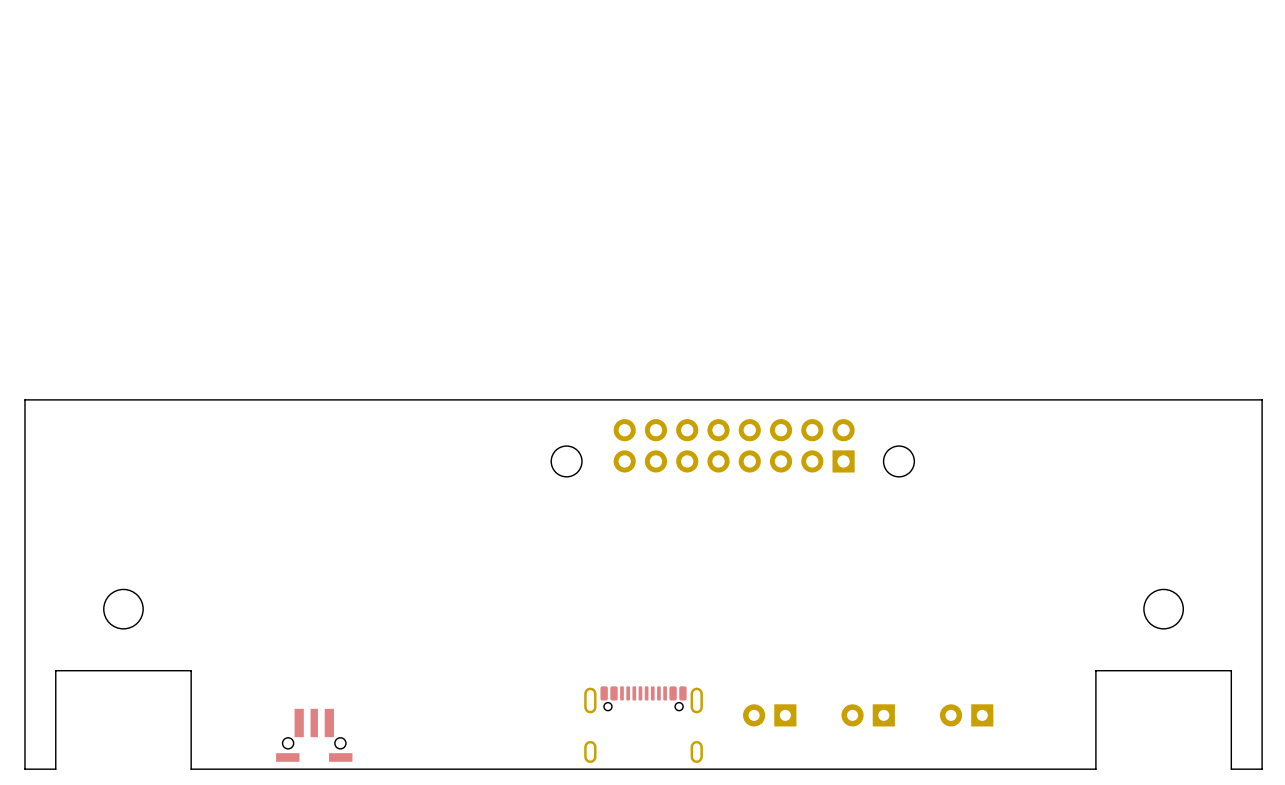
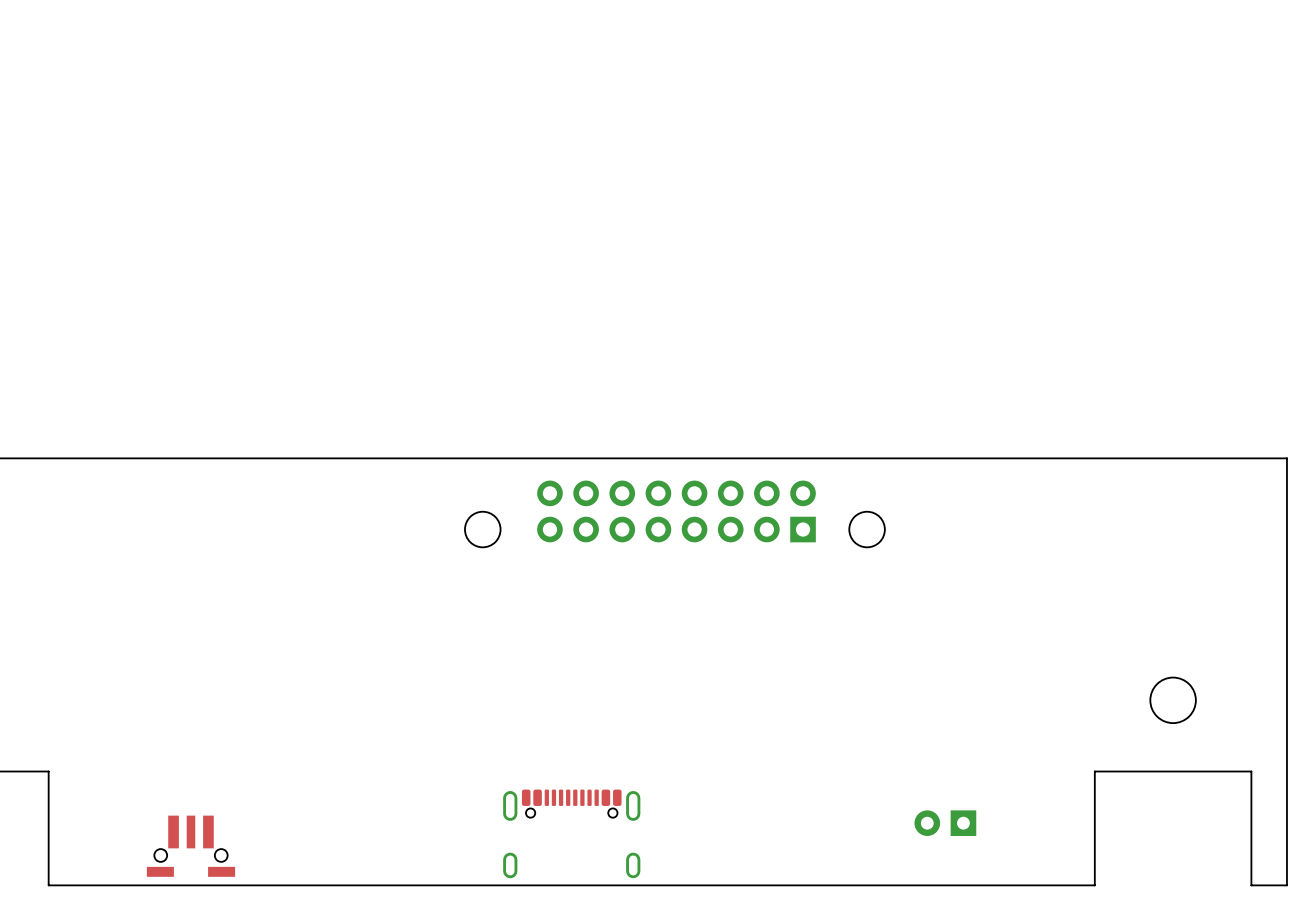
part: (769, 715) -> none
part: (868, 715) -> none

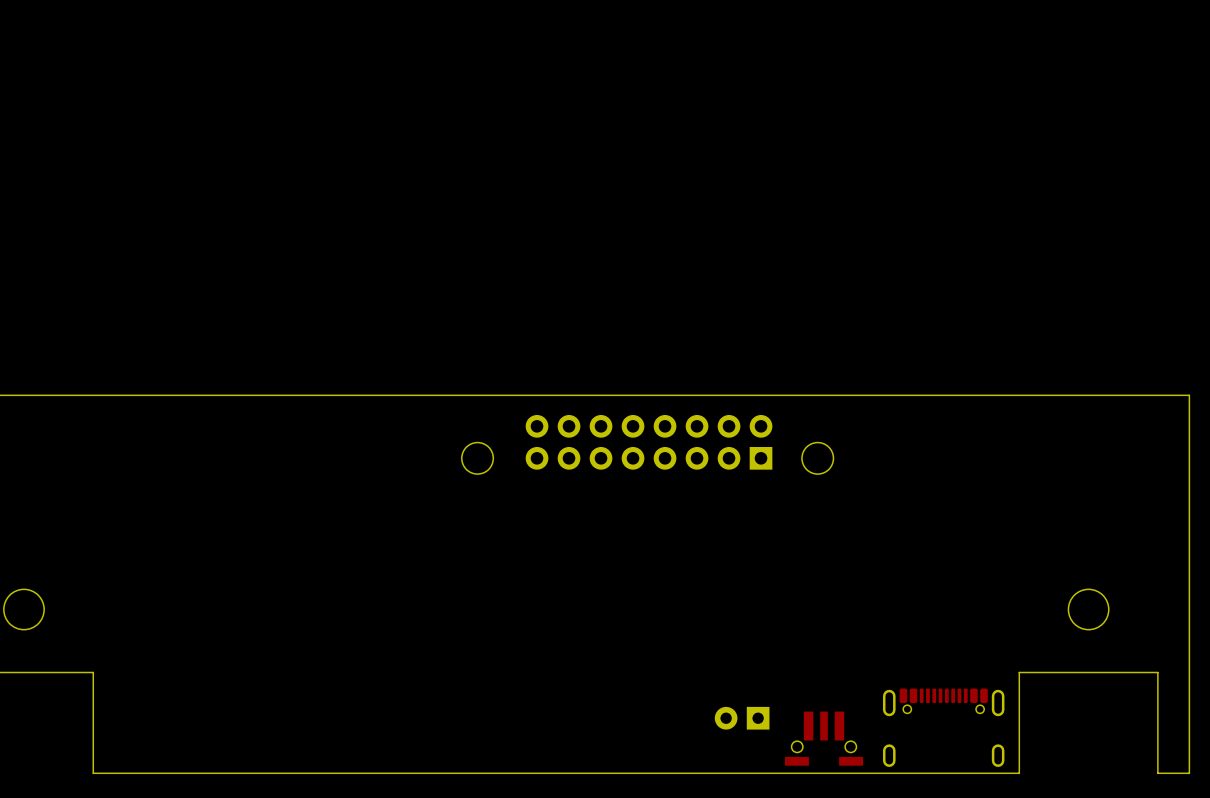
part position: (945, 823) -> (742, 718)
part: (571, 833) -> none
part: none -> (943, 727)
part: (190, 846) -> none
part: none -> (824, 738)

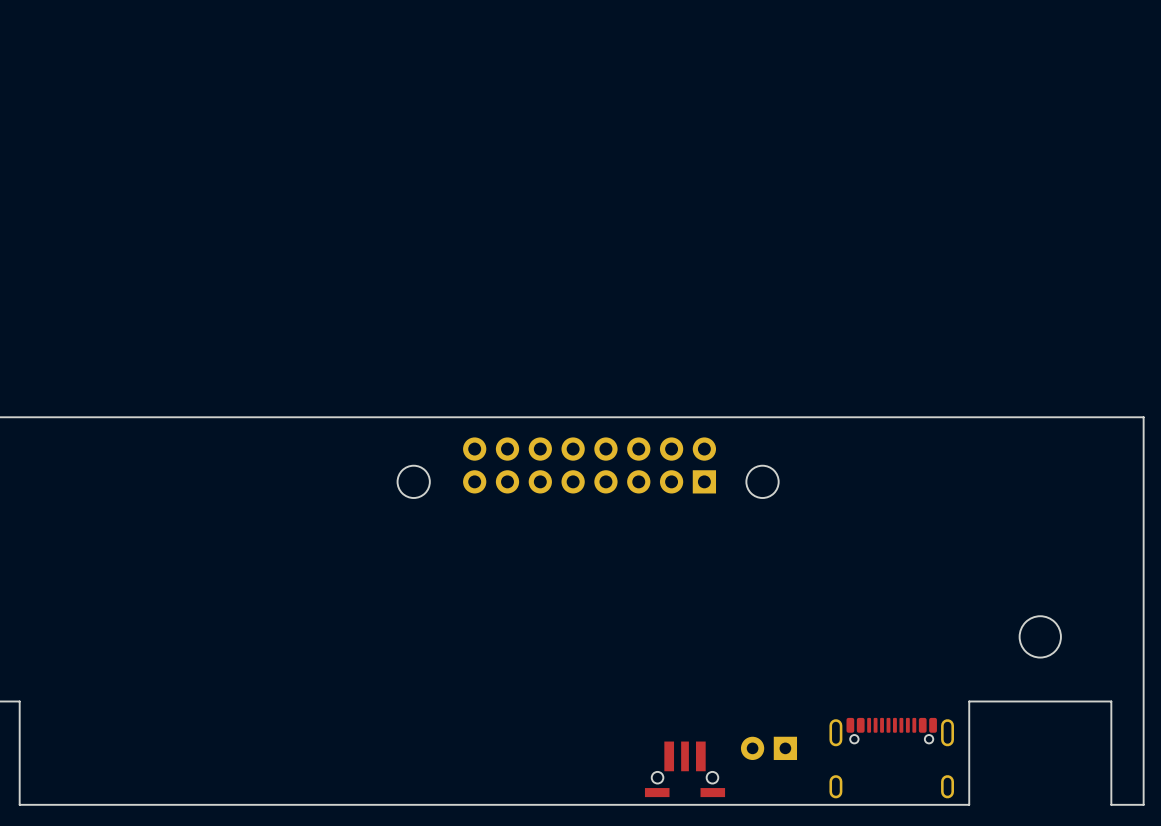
part position: (742, 718) -> (768, 748)
part position: (824, 738) -> (685, 769)

